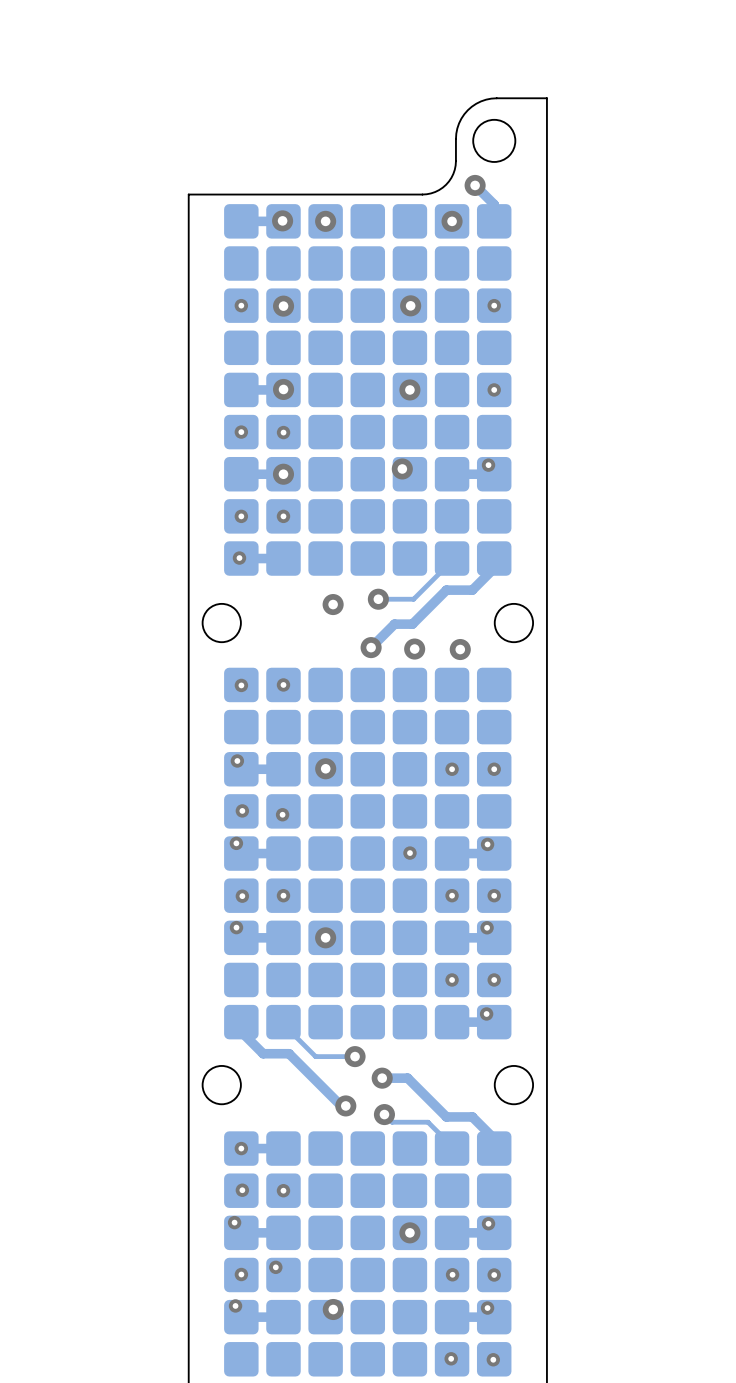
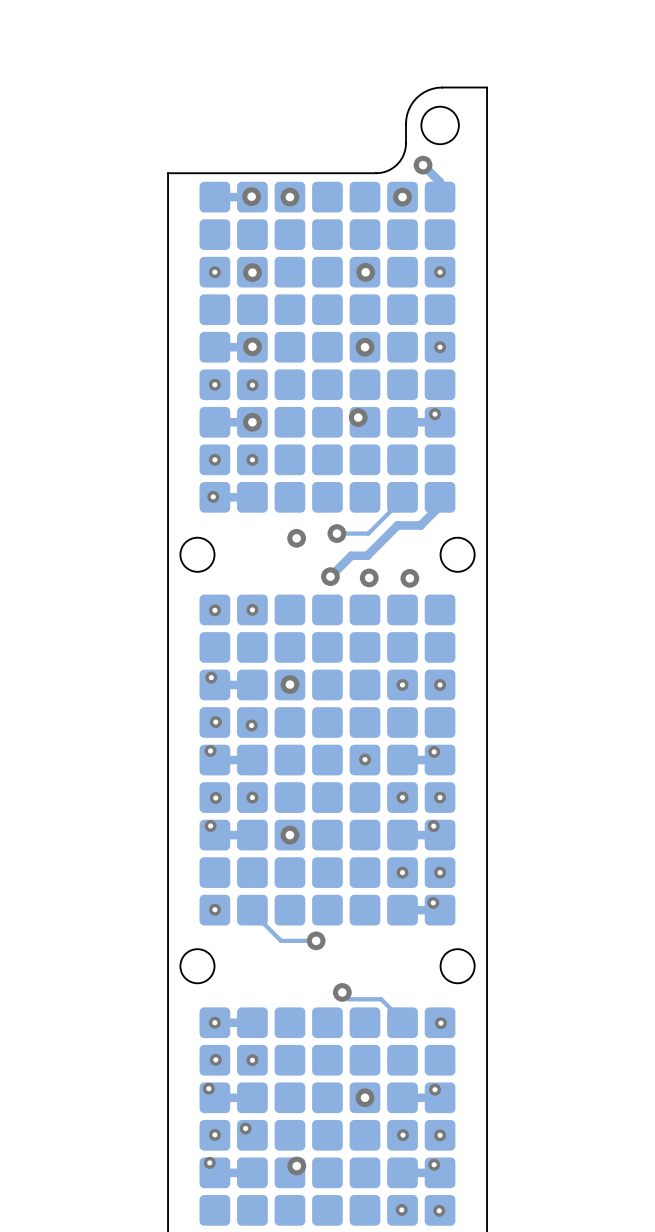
via: none -> (214, 909)
track: (241, 1031) (263, 1053) (289, 1053) (341, 1105) (345, 1105) -> none
track: (382, 1078) (407, 1078) (446, 1116) (472, 1116) (494, 1138) -> none
via: (382, 1078) -> none
via: (345, 1105) -> none
via: none -> (440, 1023)

